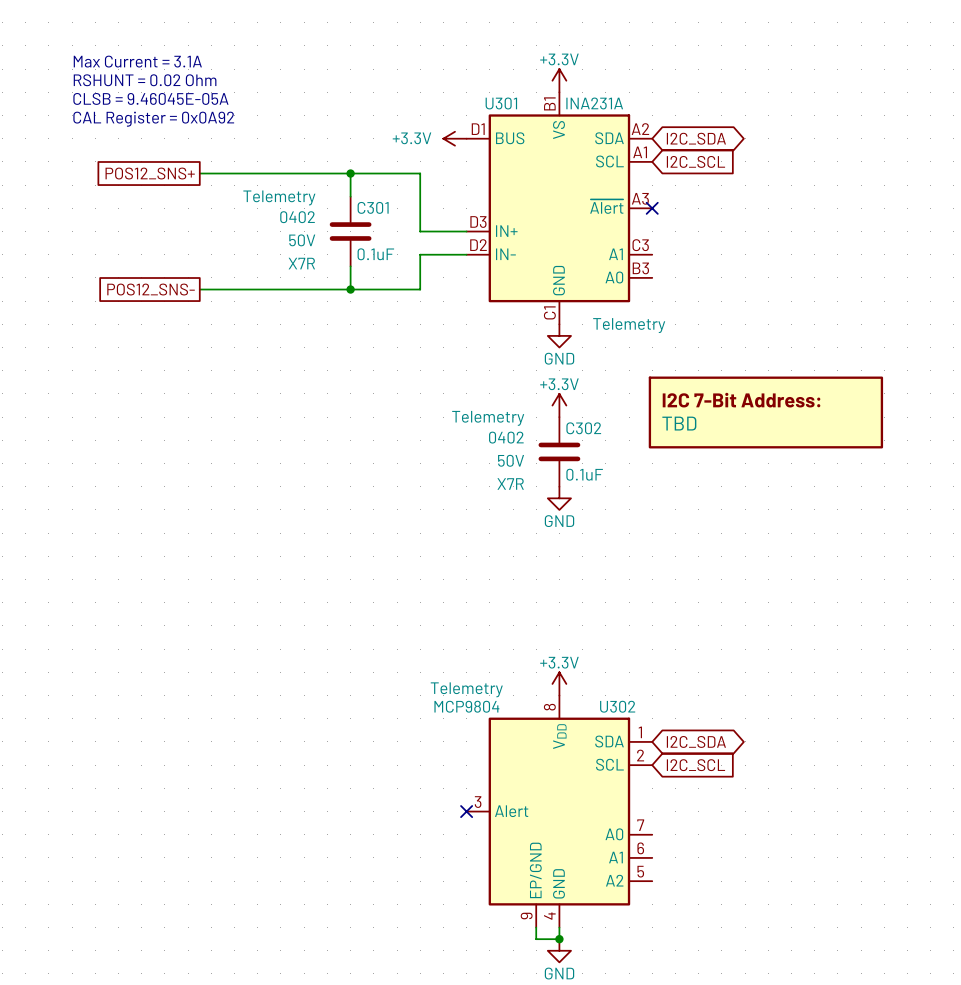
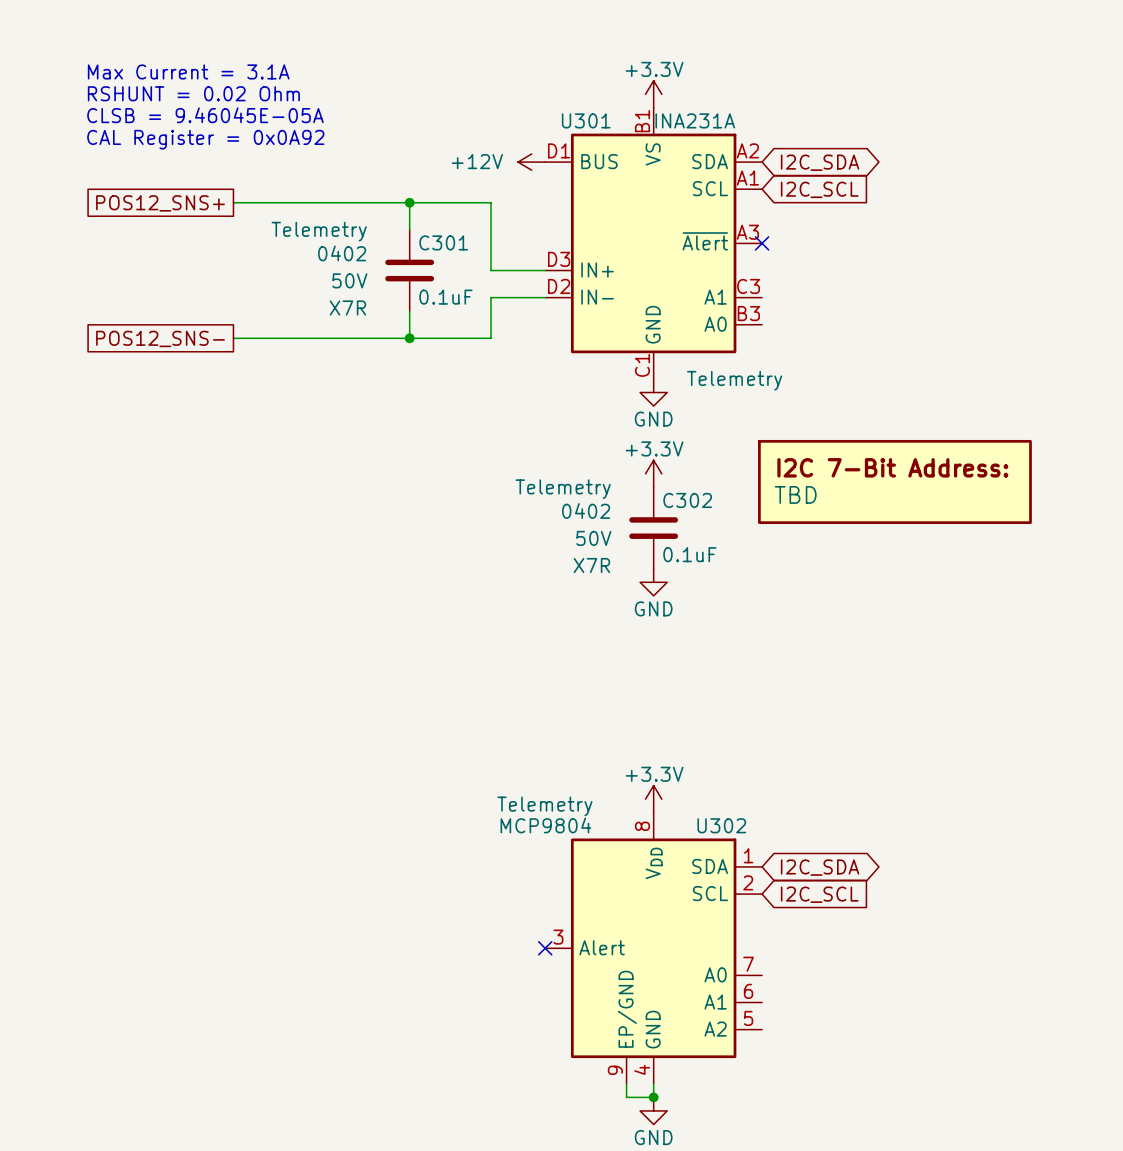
power symbol: +3.3V (455, 138) -> +12V (531, 162)

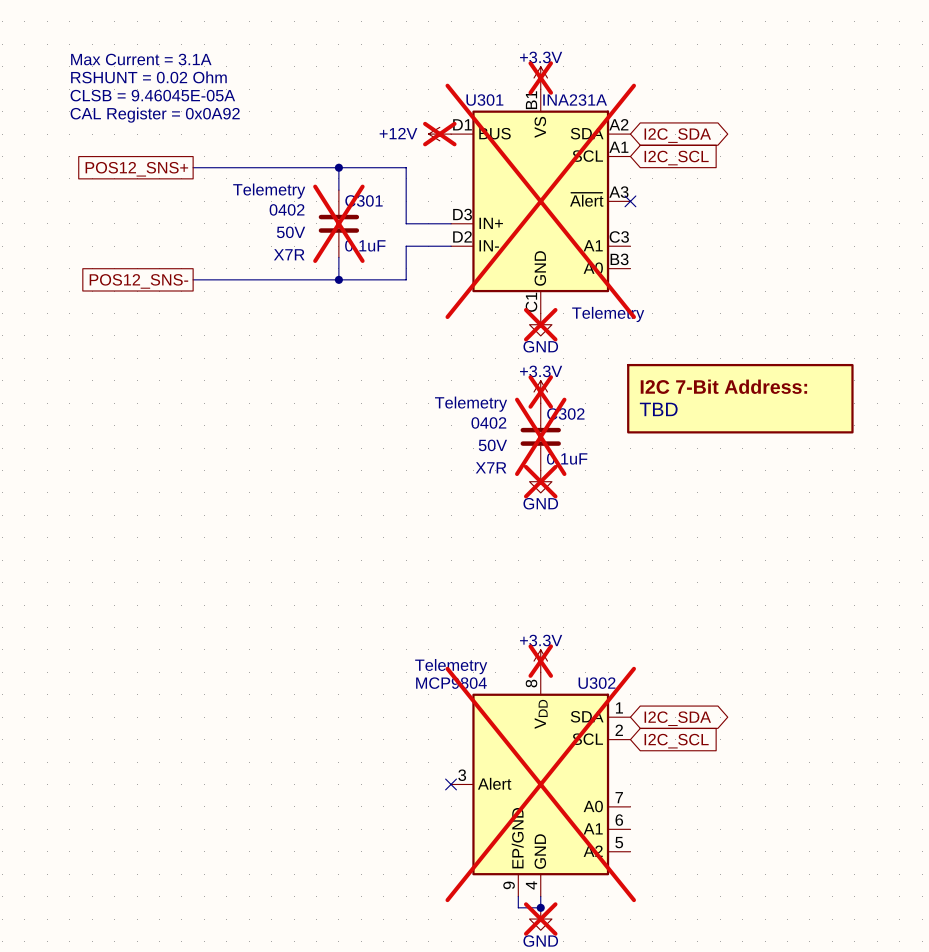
power symbol do-not-place cross: none -> (540, 78)
power symbol do-not-place cross: none -> (439, 134)
U301 do-not-place cross: none -> (540, 201)
C301 do-not-place cross: none -> (338, 223)
power symbol do-not-place cross: none -> (540, 324)
power symbol do-not-place cross: none -> (540, 391)
C302 do-not-place cross: none -> (540, 436)
power symbol do-not-place cross: none -> (540, 481)
power symbol do-not-place cross: none -> (540, 661)
U302 do-not-place cross: none -> (540, 784)
power symbol do-not-place cross: none -> (540, 919)

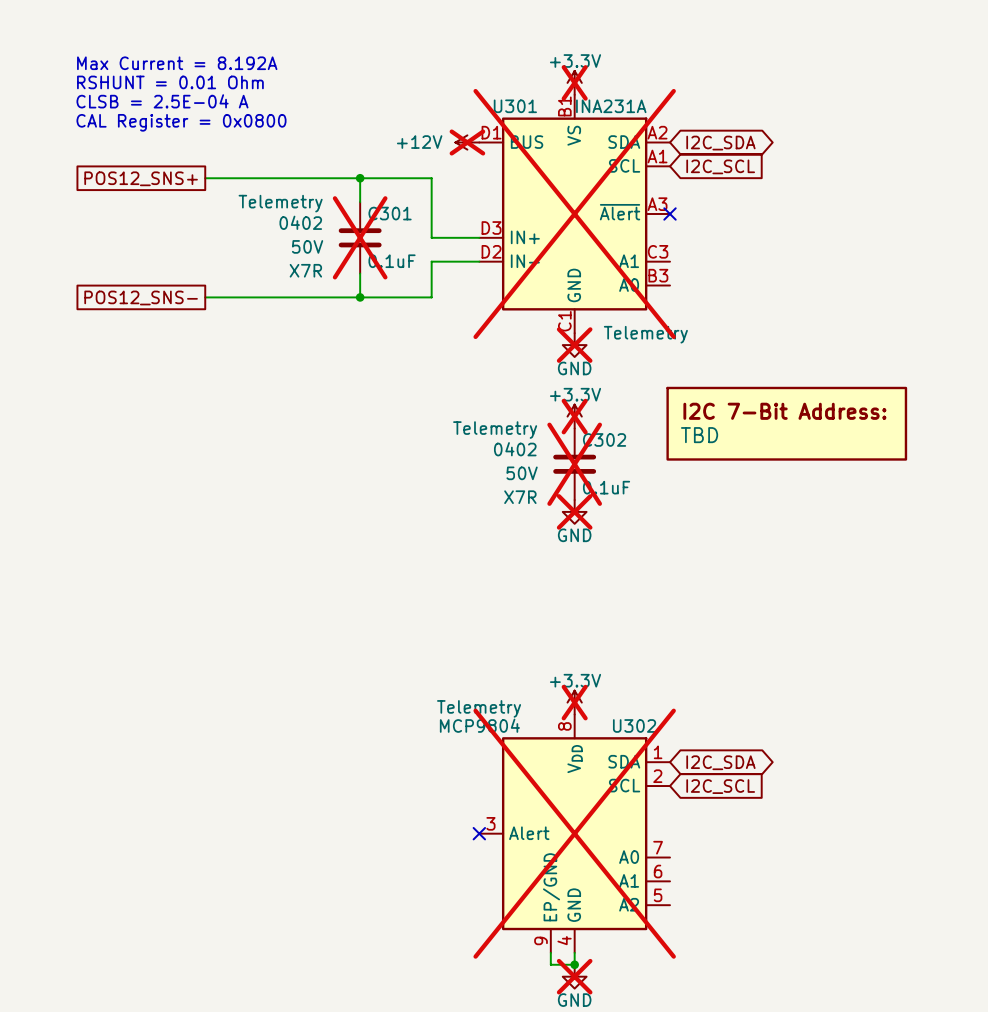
text: Max Current = 3.1A (141, 59) -> Max Current = 8.192A (177, 63)
text: RSHUNT = 0.02 Ohm (148, 77) -> RSHUNT = 0.01 Ohm (170, 82)
text: CLSB = 9.46045E-05A (152, 95) -> CLSB = 2.5E-04 A (162, 101)
text: CAL Register = 0x0A92 (155, 115) -> CAL Register = 0x0800 (181, 122)

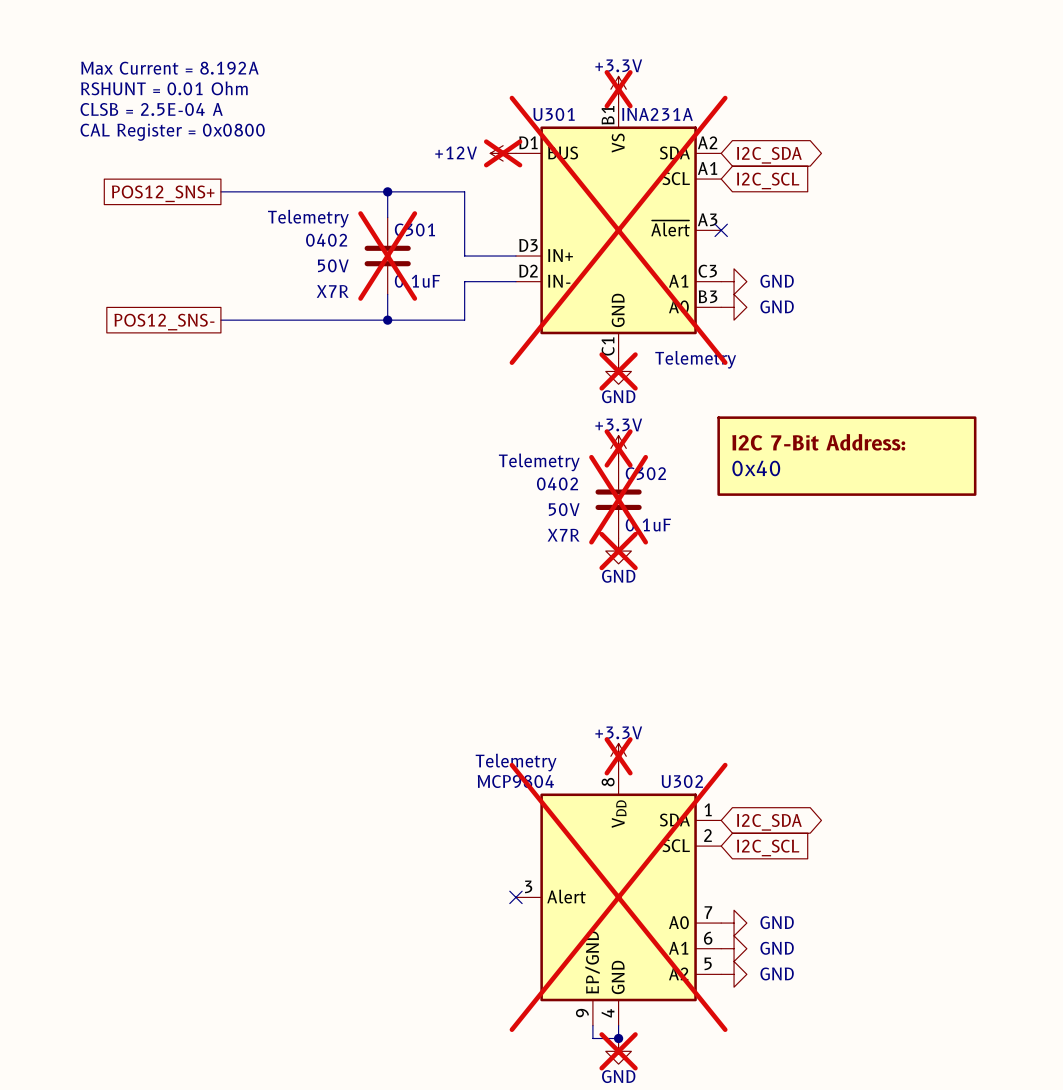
power symbol: none -> GND (734, 281)
power symbol: none -> GND (734, 307)
part value: TBD (699, 435) -> 0x40 (756, 468)
power symbol: none -> GND (734, 923)
power symbol: none -> GND (734, 948)
power symbol: none -> GND (734, 974)

